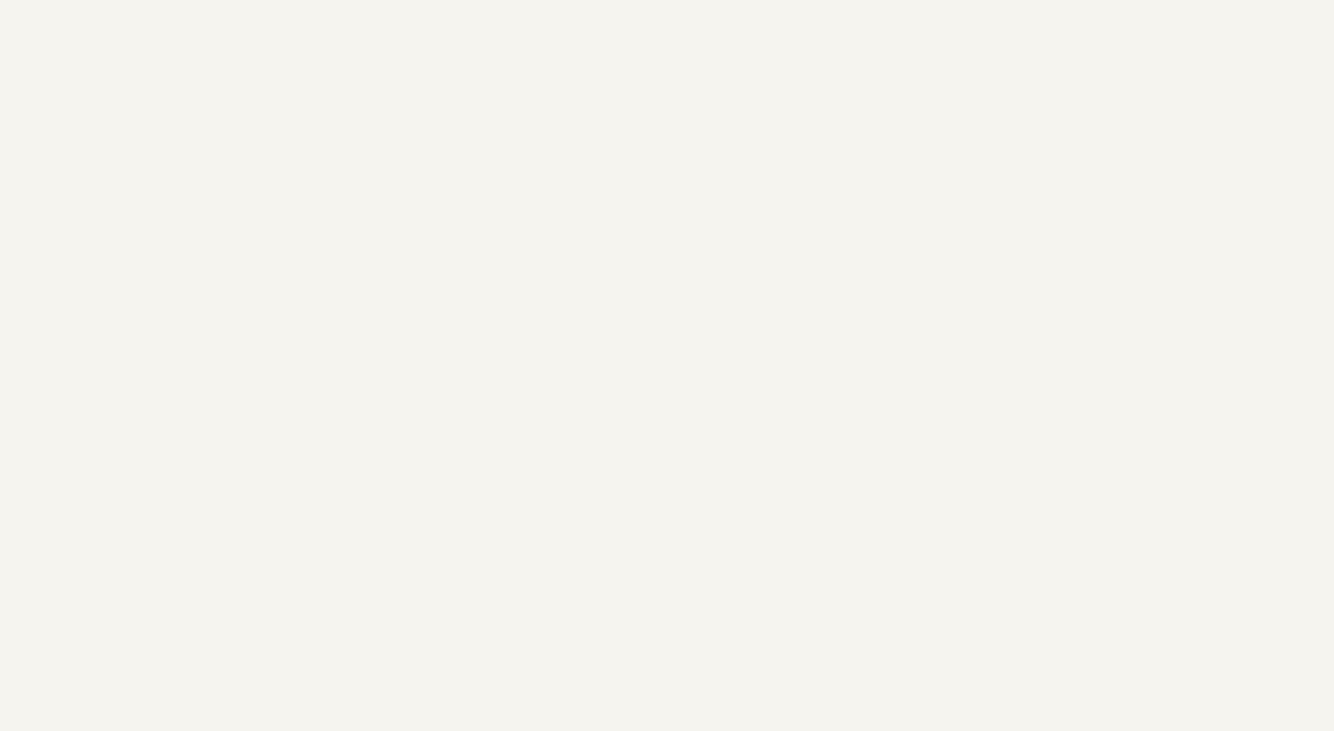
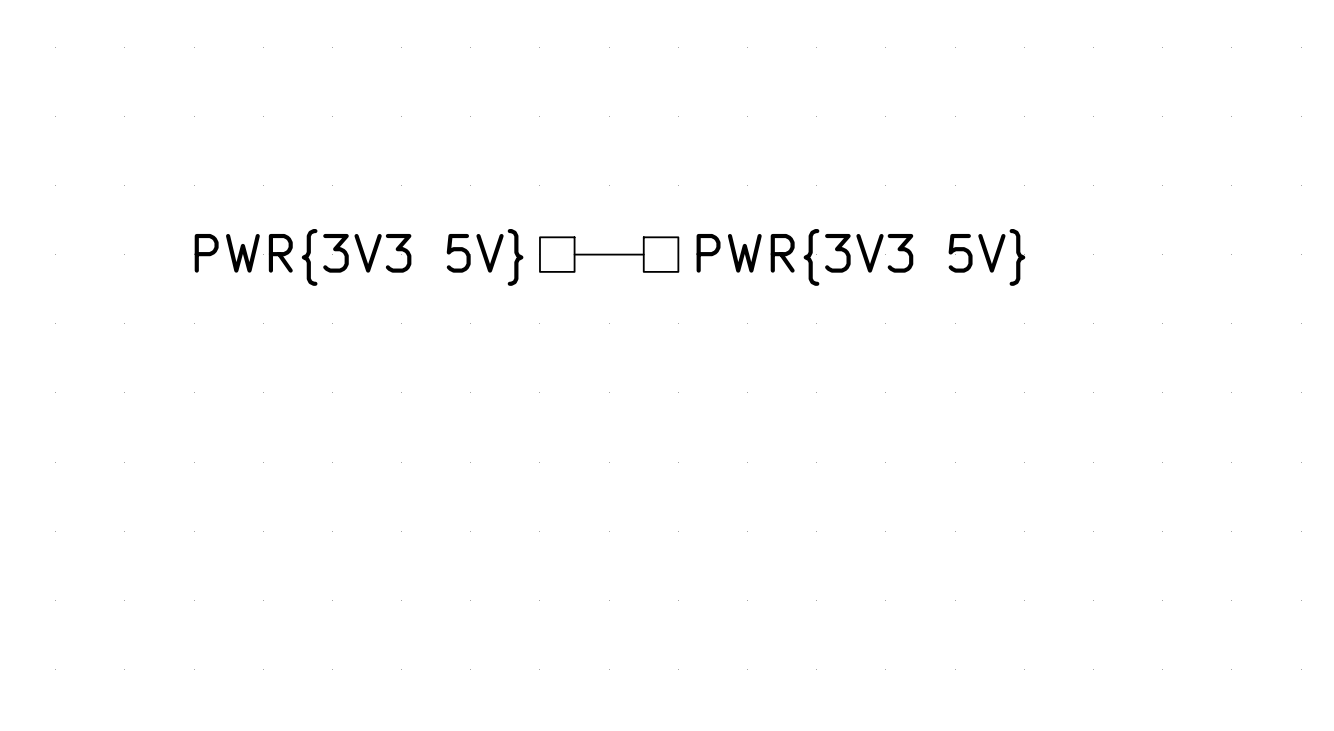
bus: none -> (574, 254) (643, 254)
hierarchical label: none -> PWR{3V3 5V} (359, 257)
sheet pin: none -> PWR{3V3 5V} (860, 257)

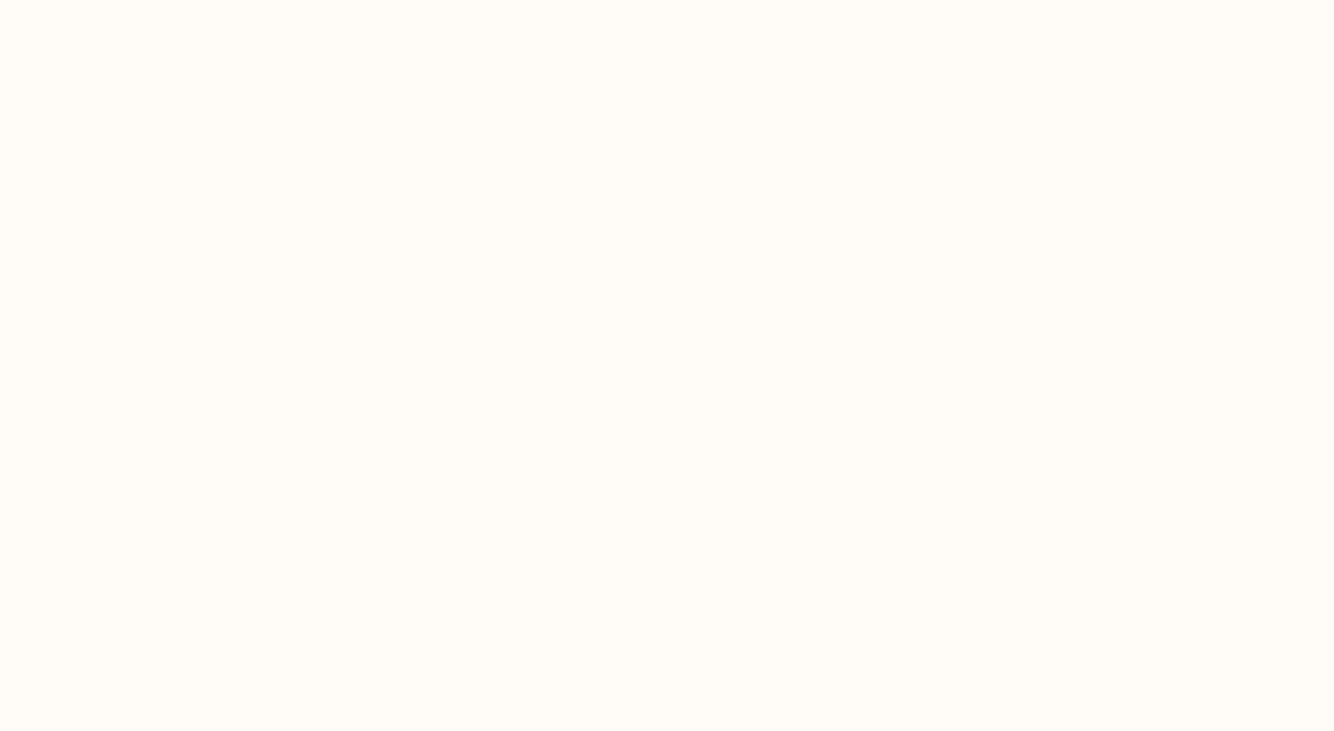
bus: (574, 254) (643, 254) -> none
hierarchical label: PWR{3V3 5V} (359, 257) -> none
sheet pin: PWR{3V3 5V} (860, 257) -> none

